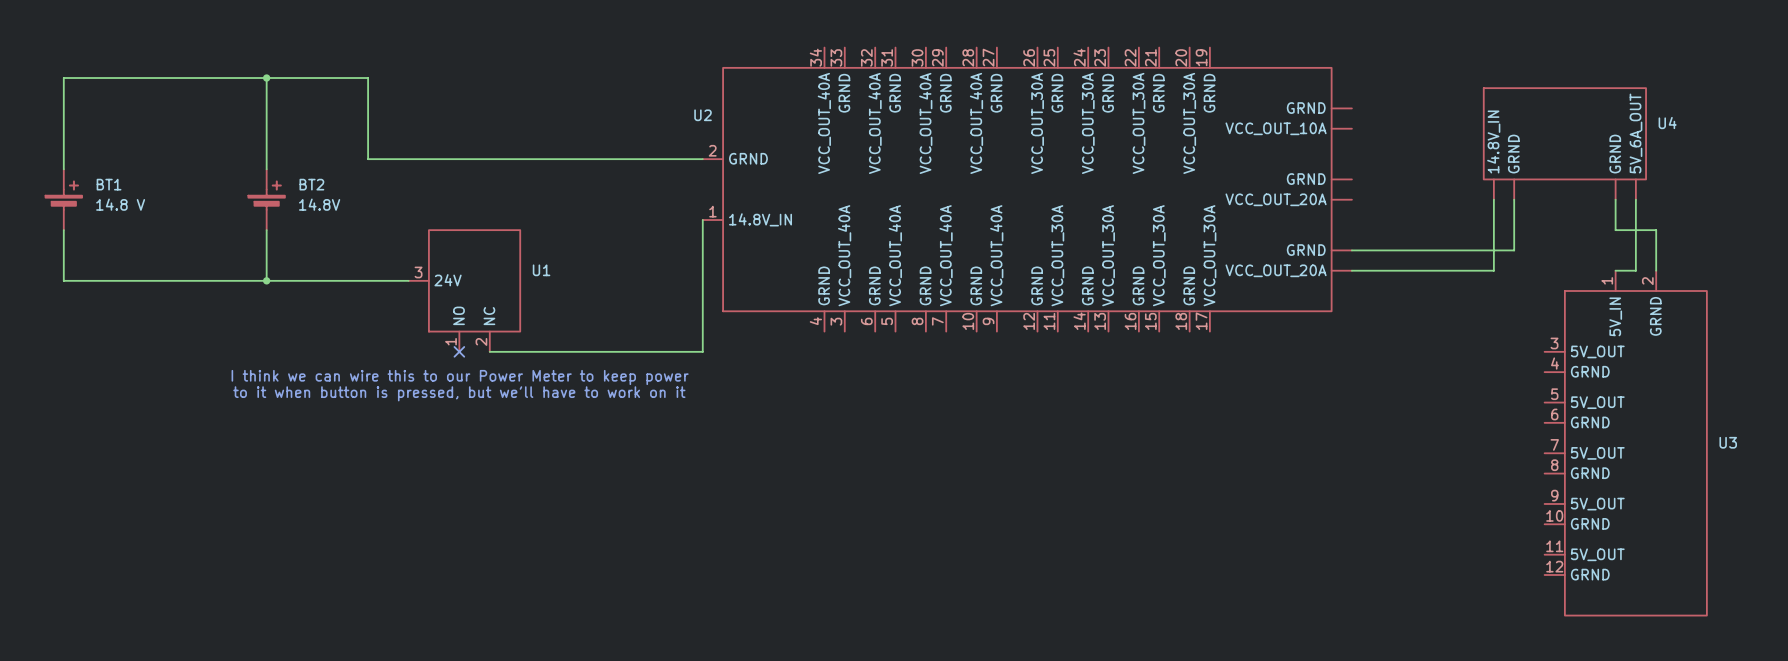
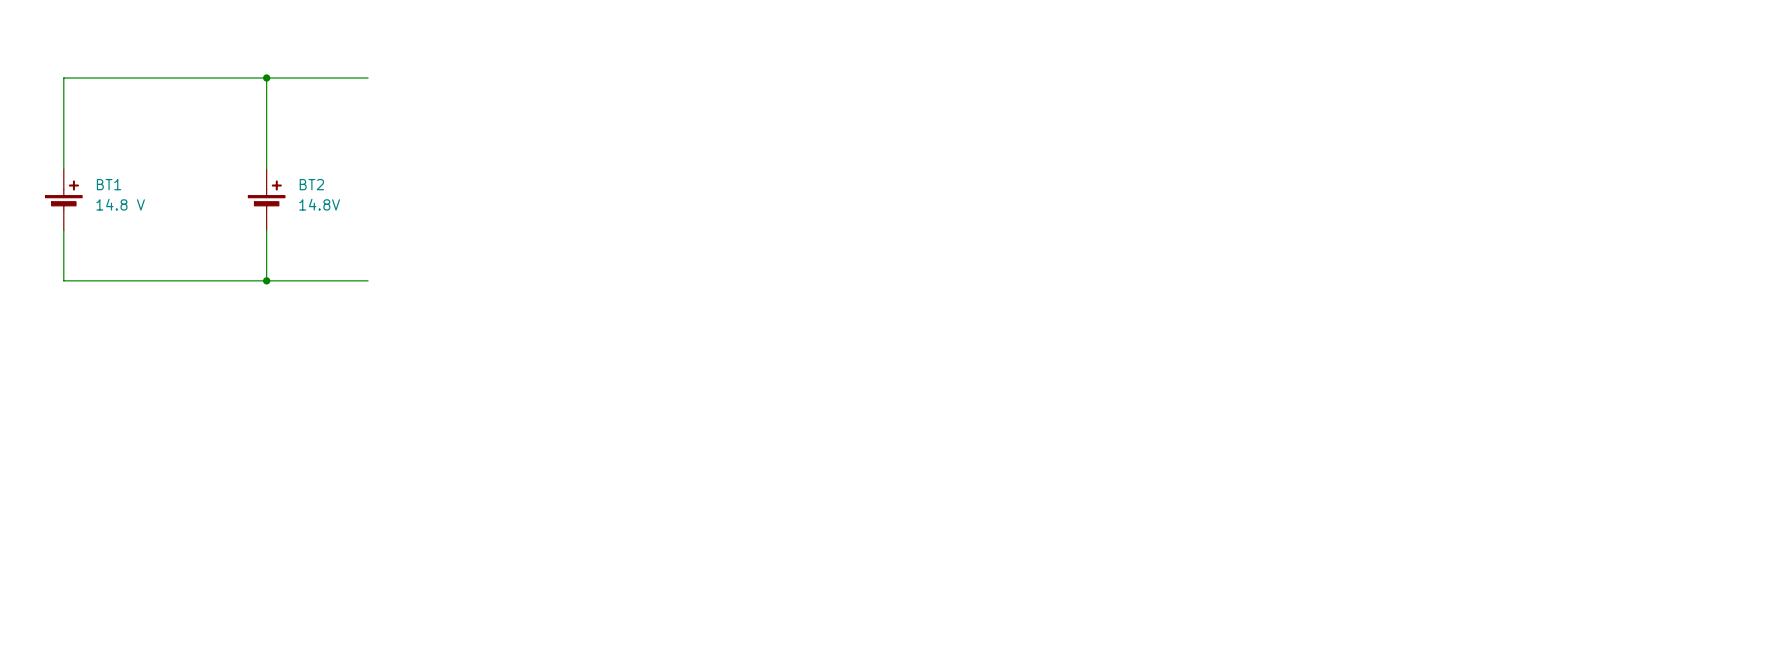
wire: (368, 78) (368, 159) (702, 159) -> none
U4: (1564, 143) -> none
U2: (1027, 189) -> none
wire: (1493, 199) (1493, 270) (1351, 270) -> none
wire: (1514, 199) (1514, 250) (1351, 250) -> none
wire: (1615, 199) (1615, 230) (1656, 230) (1656, 270) -> none
wire: (1635, 199) (1635, 270) (1615, 270) -> none
wire: (702, 220) (702, 351) (489, 351) -> none
wire: (368, 280) (408, 280) -> none
U1: (464, 291) -> none
no-connect mark: (459, 351) -> none
text: I think we can wire this to our Power Meter to keep power (460, 377) -> none
text: to it when button is pressed, but we'll have to work on it (459, 393) -> none
U3: (1625, 443) -> none

